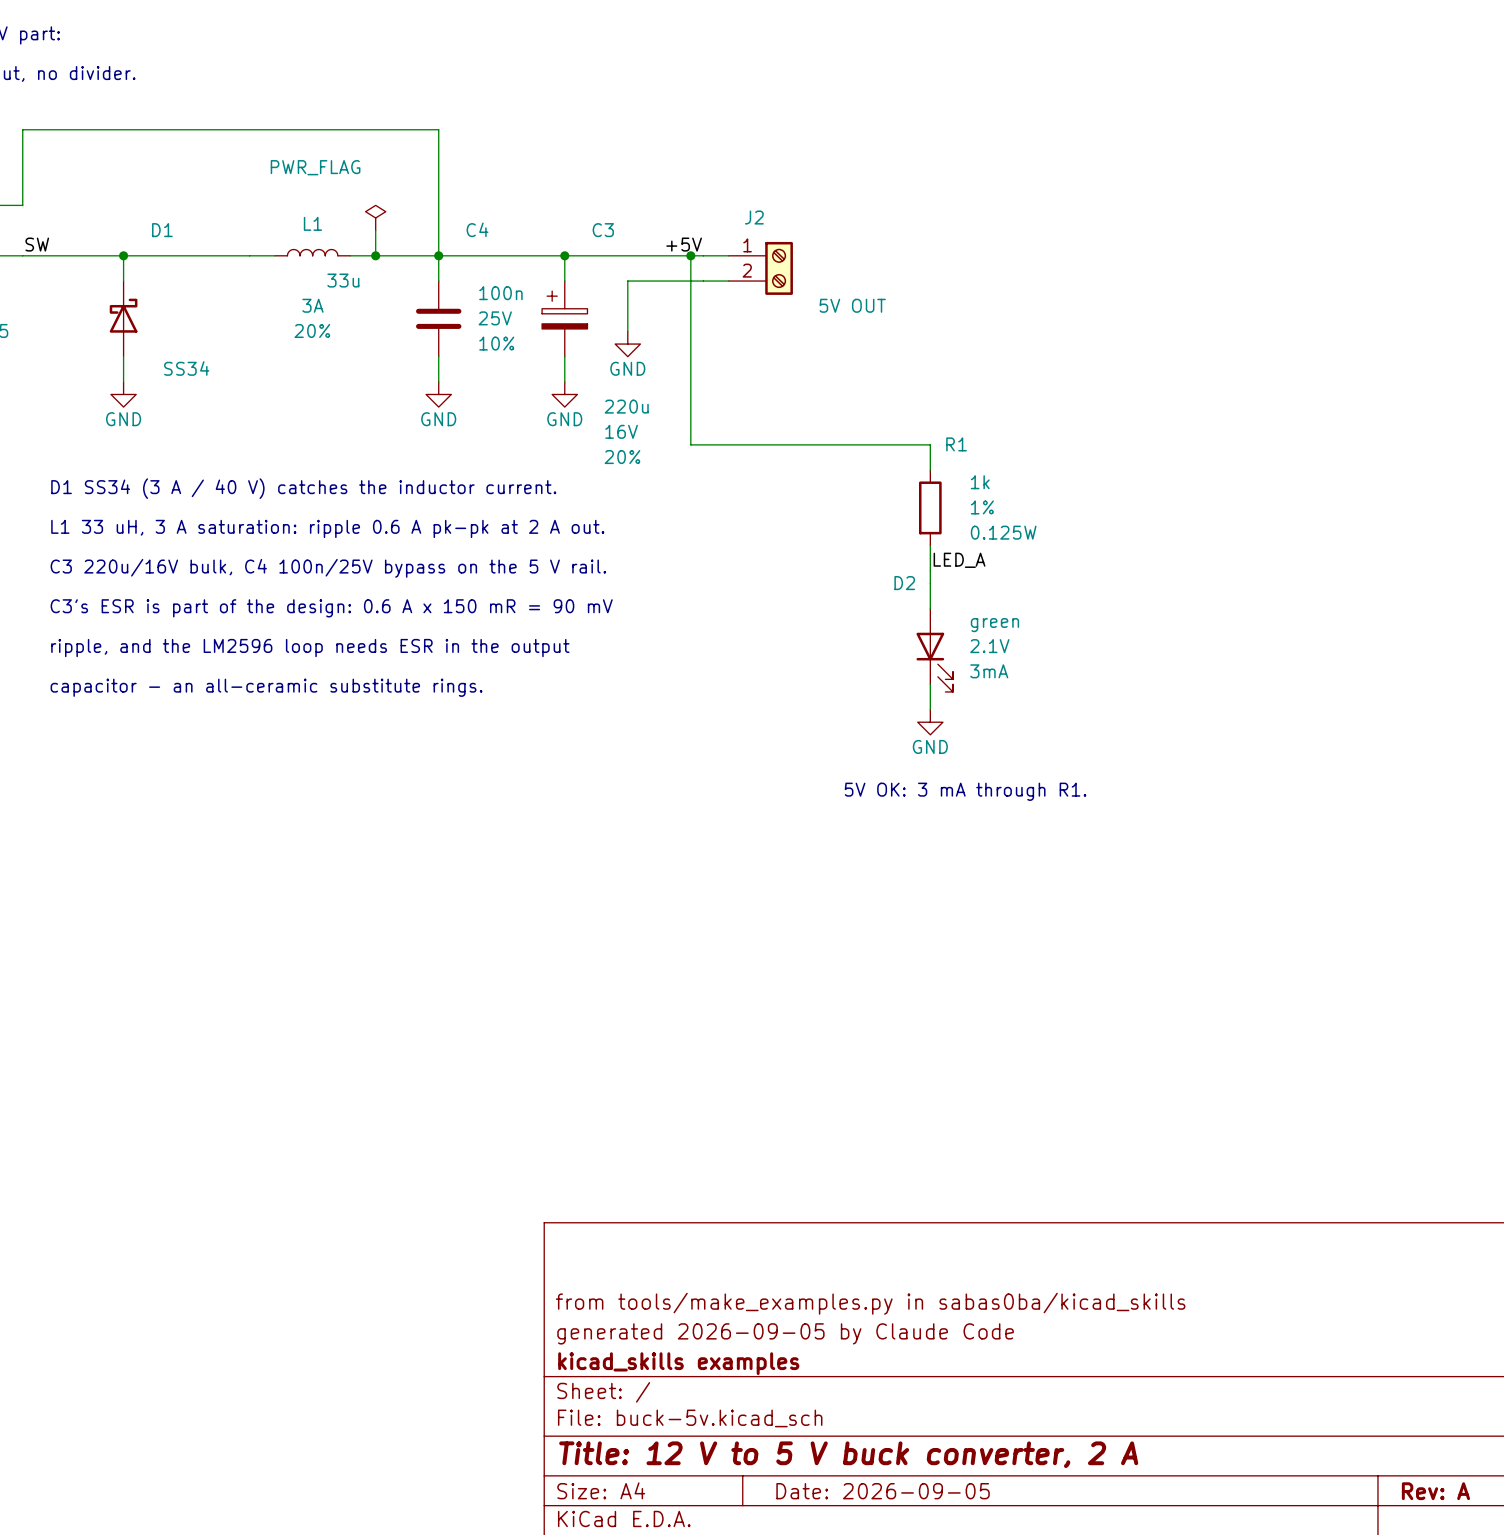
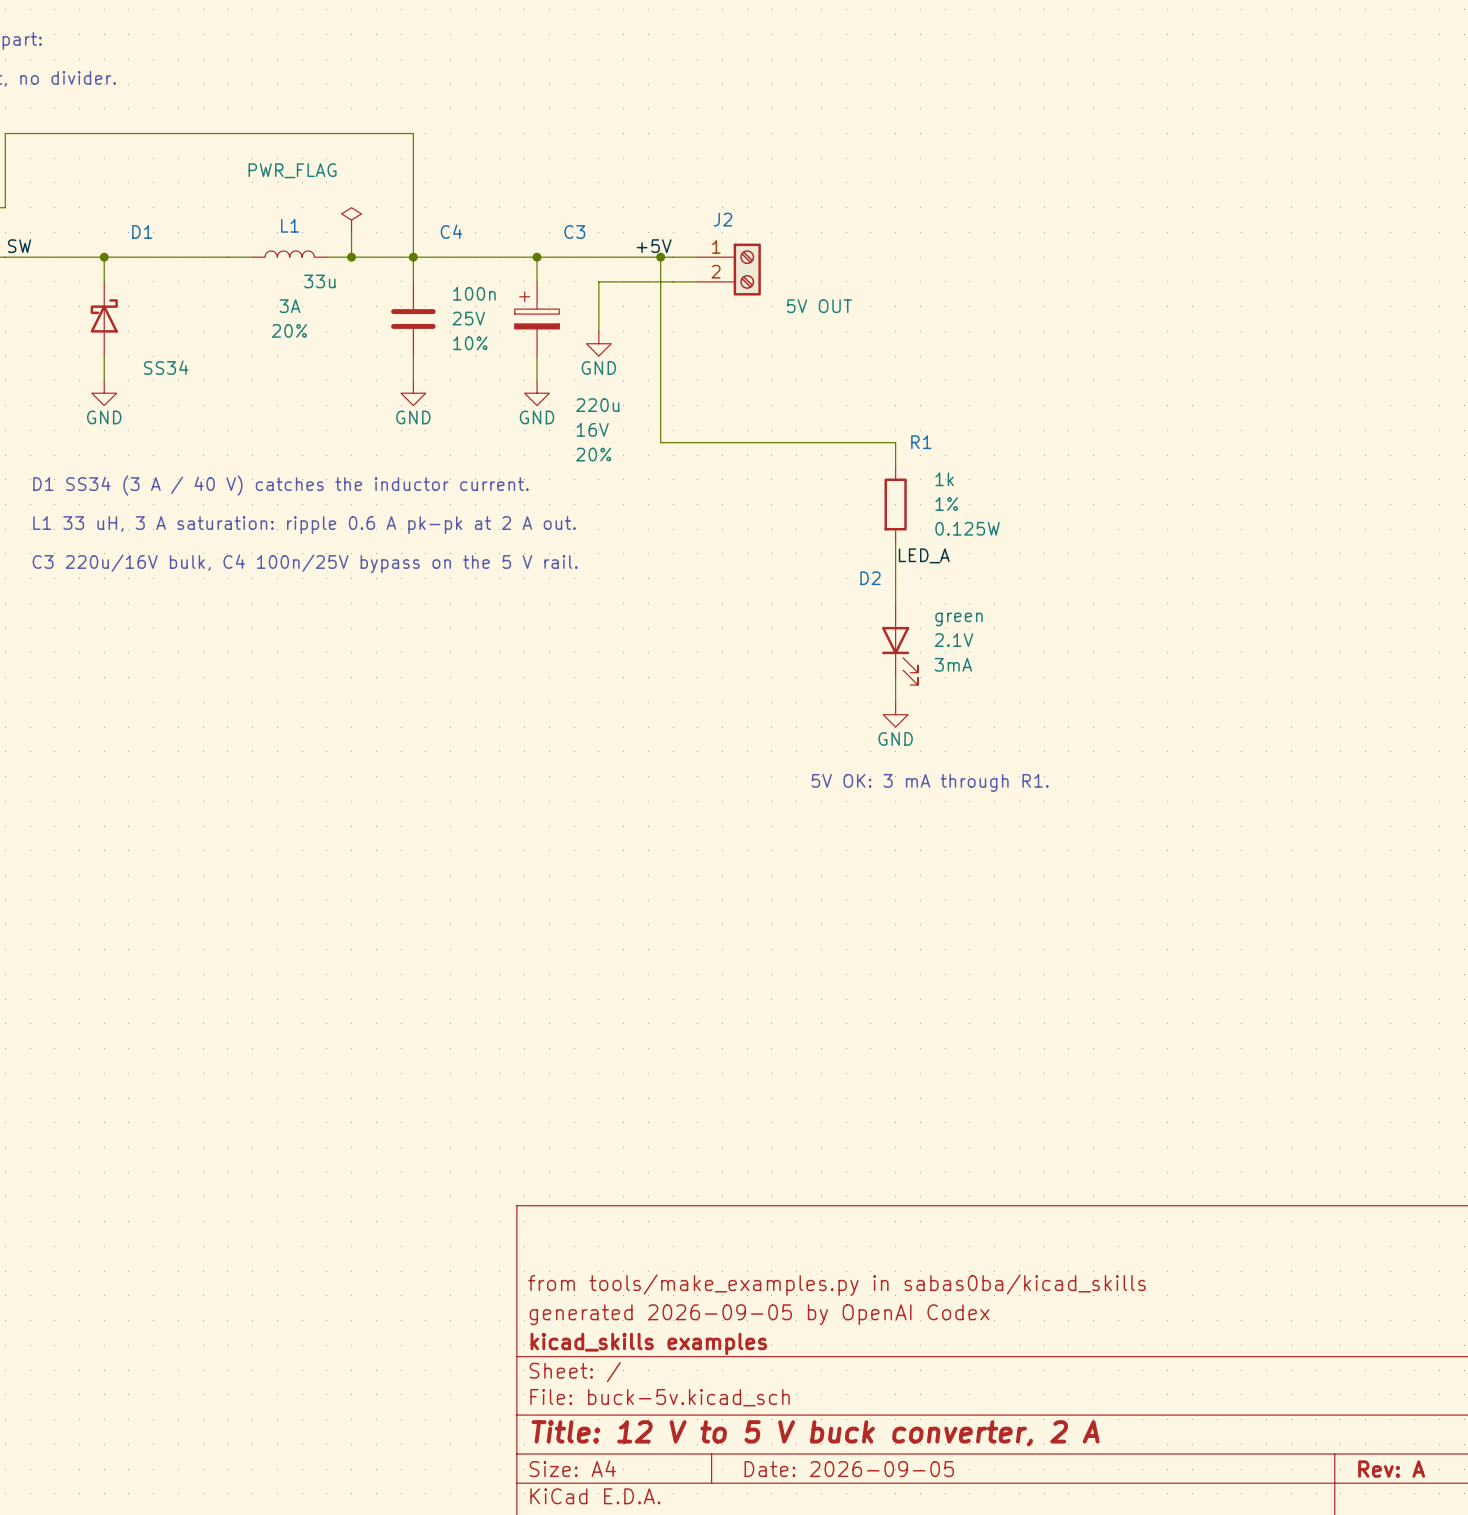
text: C3's ESR is part of the design: 0.6 A x 150 mR = 90 mV (331, 608) -> none
text: ripple, and the LM2596 loop needs ESR in the output (310, 648) -> none
text: capacitor - an all-ceramic substitute rings. (266, 687) -> none
title block: generated 2026-09-05 by Claude Code (785, 1333) -> generated 2026-09-05 by OpenAI Codex (759, 1314)

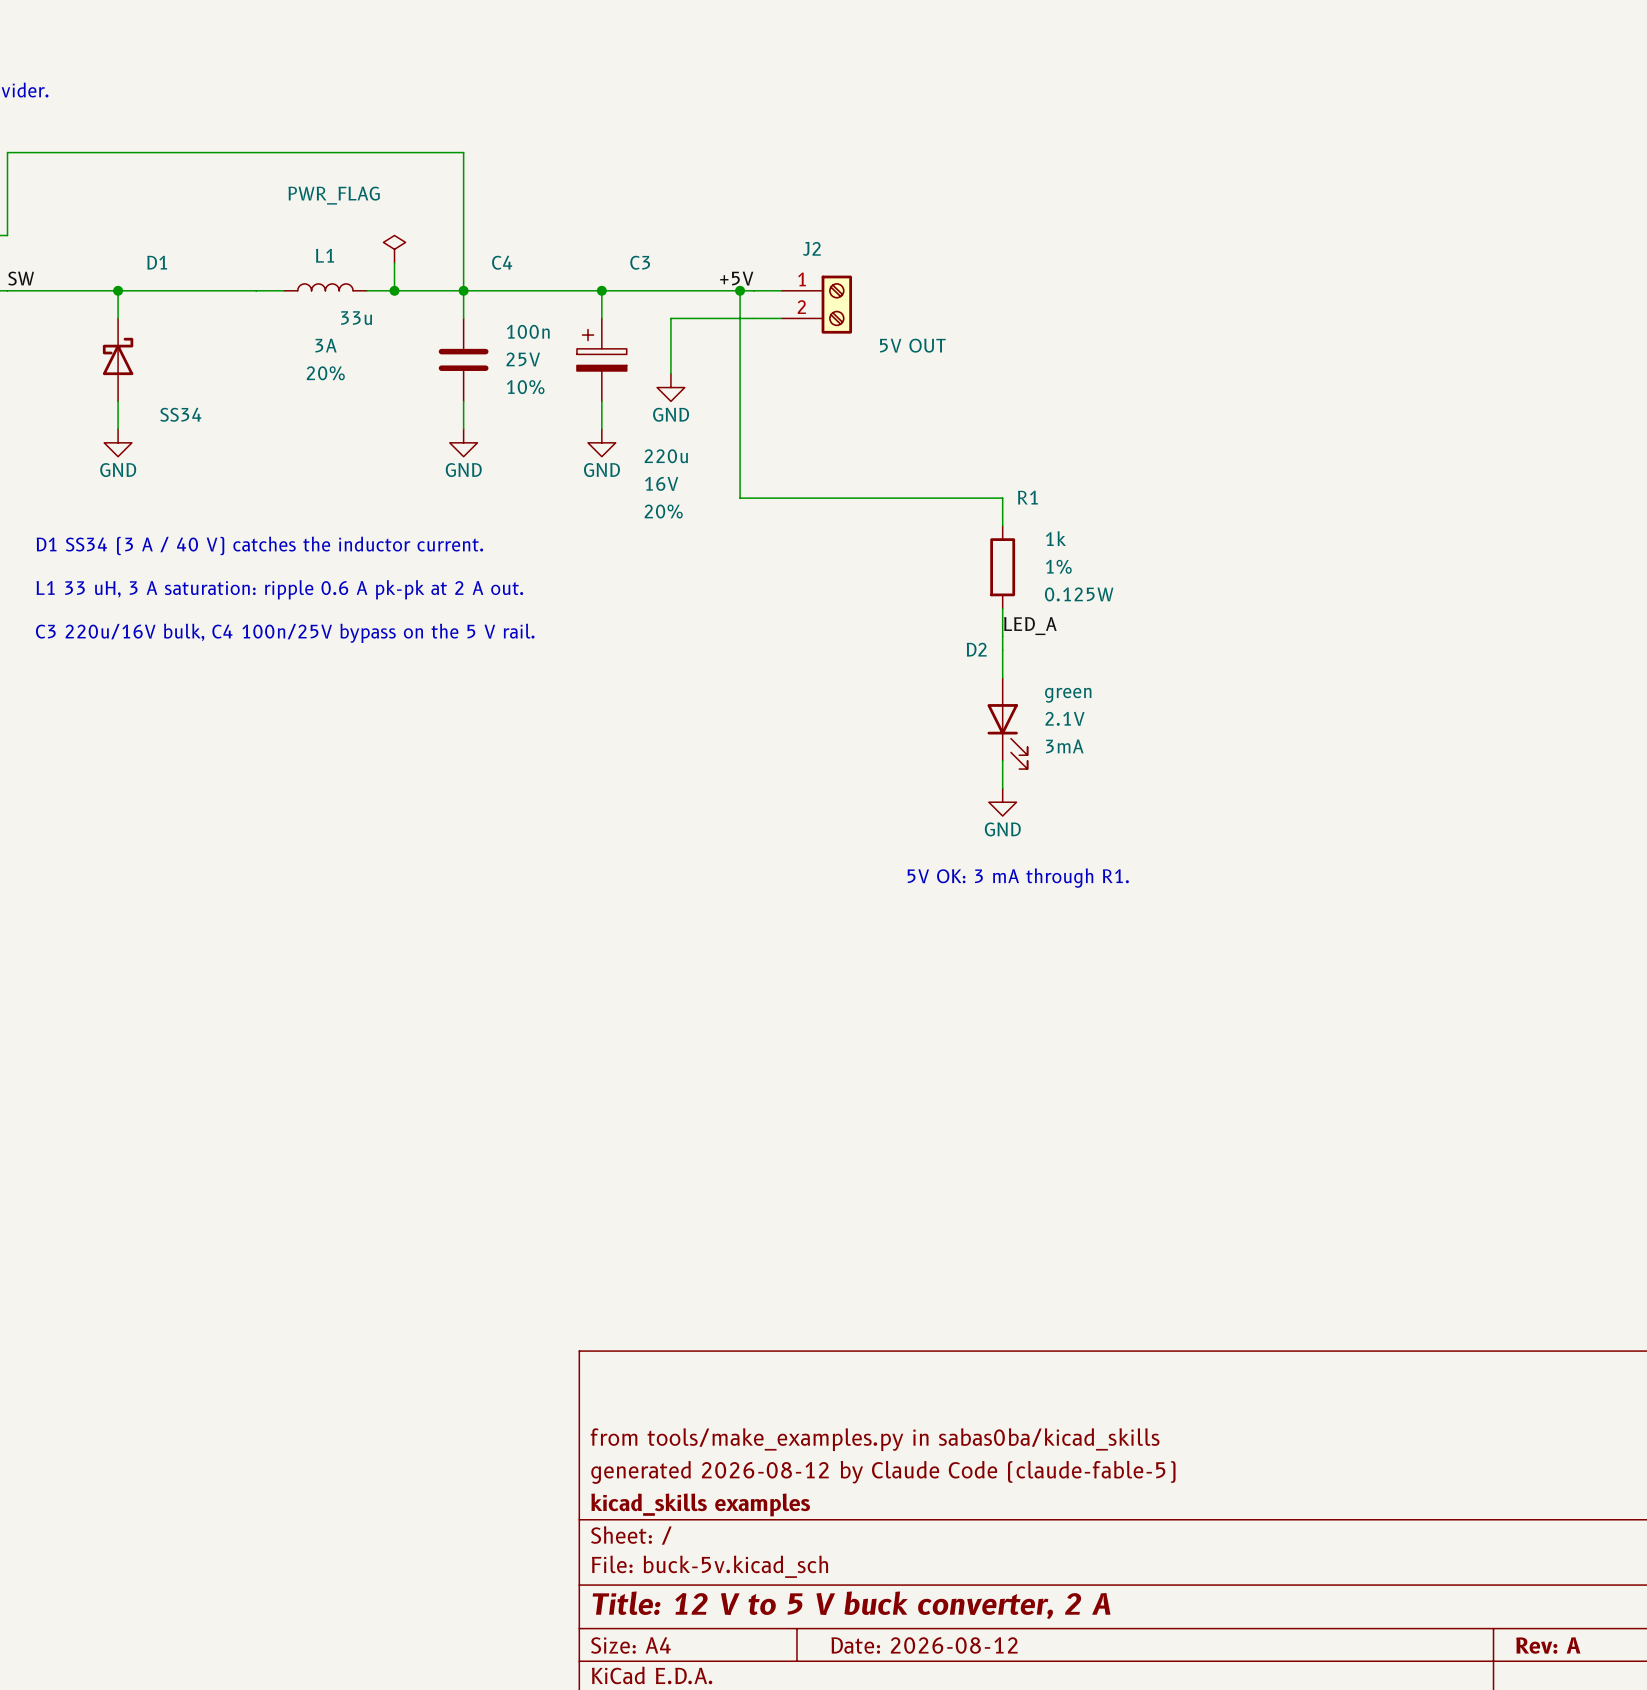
title block: generated 2026-09-05 by OpenAI Codex (759, 1314) -> generated 2026-08-12 by Claude Code (claude-fable-5) (883, 1472)
title block: Date: 2026-09-05 (849, 1469) -> Date: 2026-08-12 (924, 1645)

